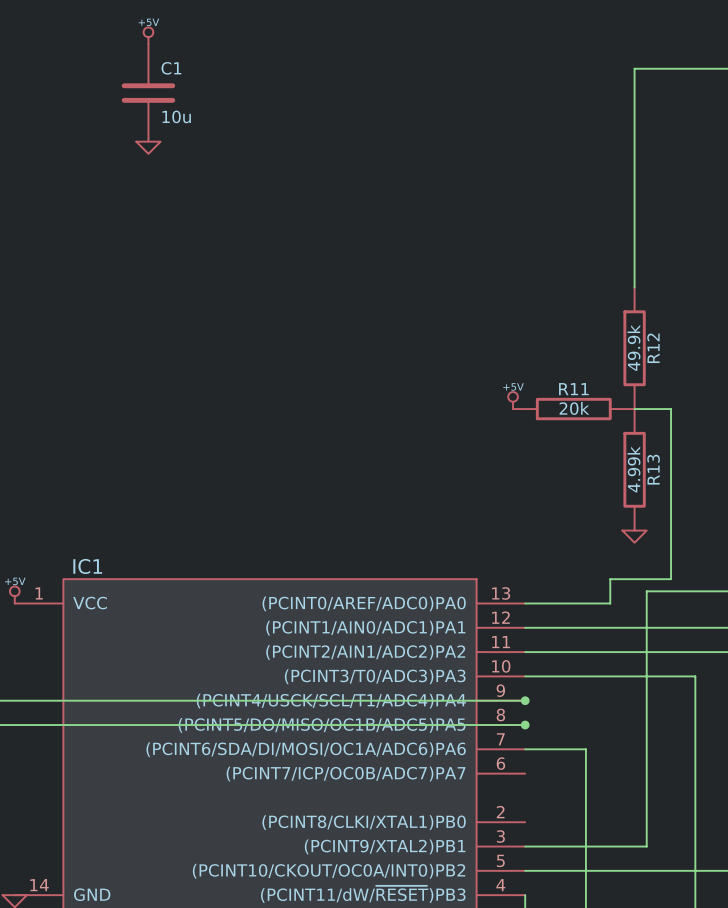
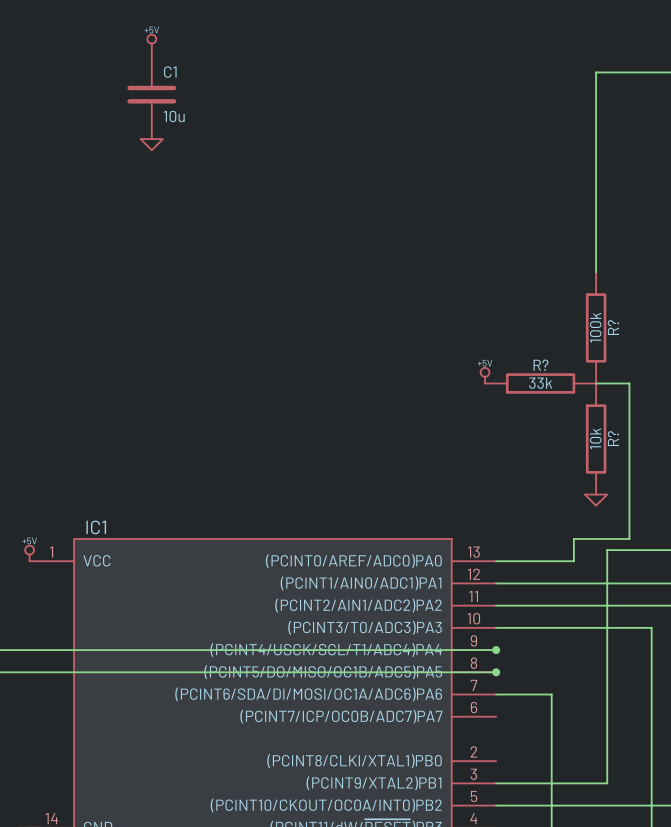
R12 value: 49.9k (633, 347) -> 100k (595, 327)
R12 name: R12 (653, 348) -> R? (613, 327)
R11 name: R11 (573, 389) -> R? (540, 365)
R11 value: 20k (574, 408) -> 33k (540, 383)
R13 value: 4.99k (633, 469) -> 10k (595, 438)
R13 name: R13 (653, 469) -> R? (613, 438)

